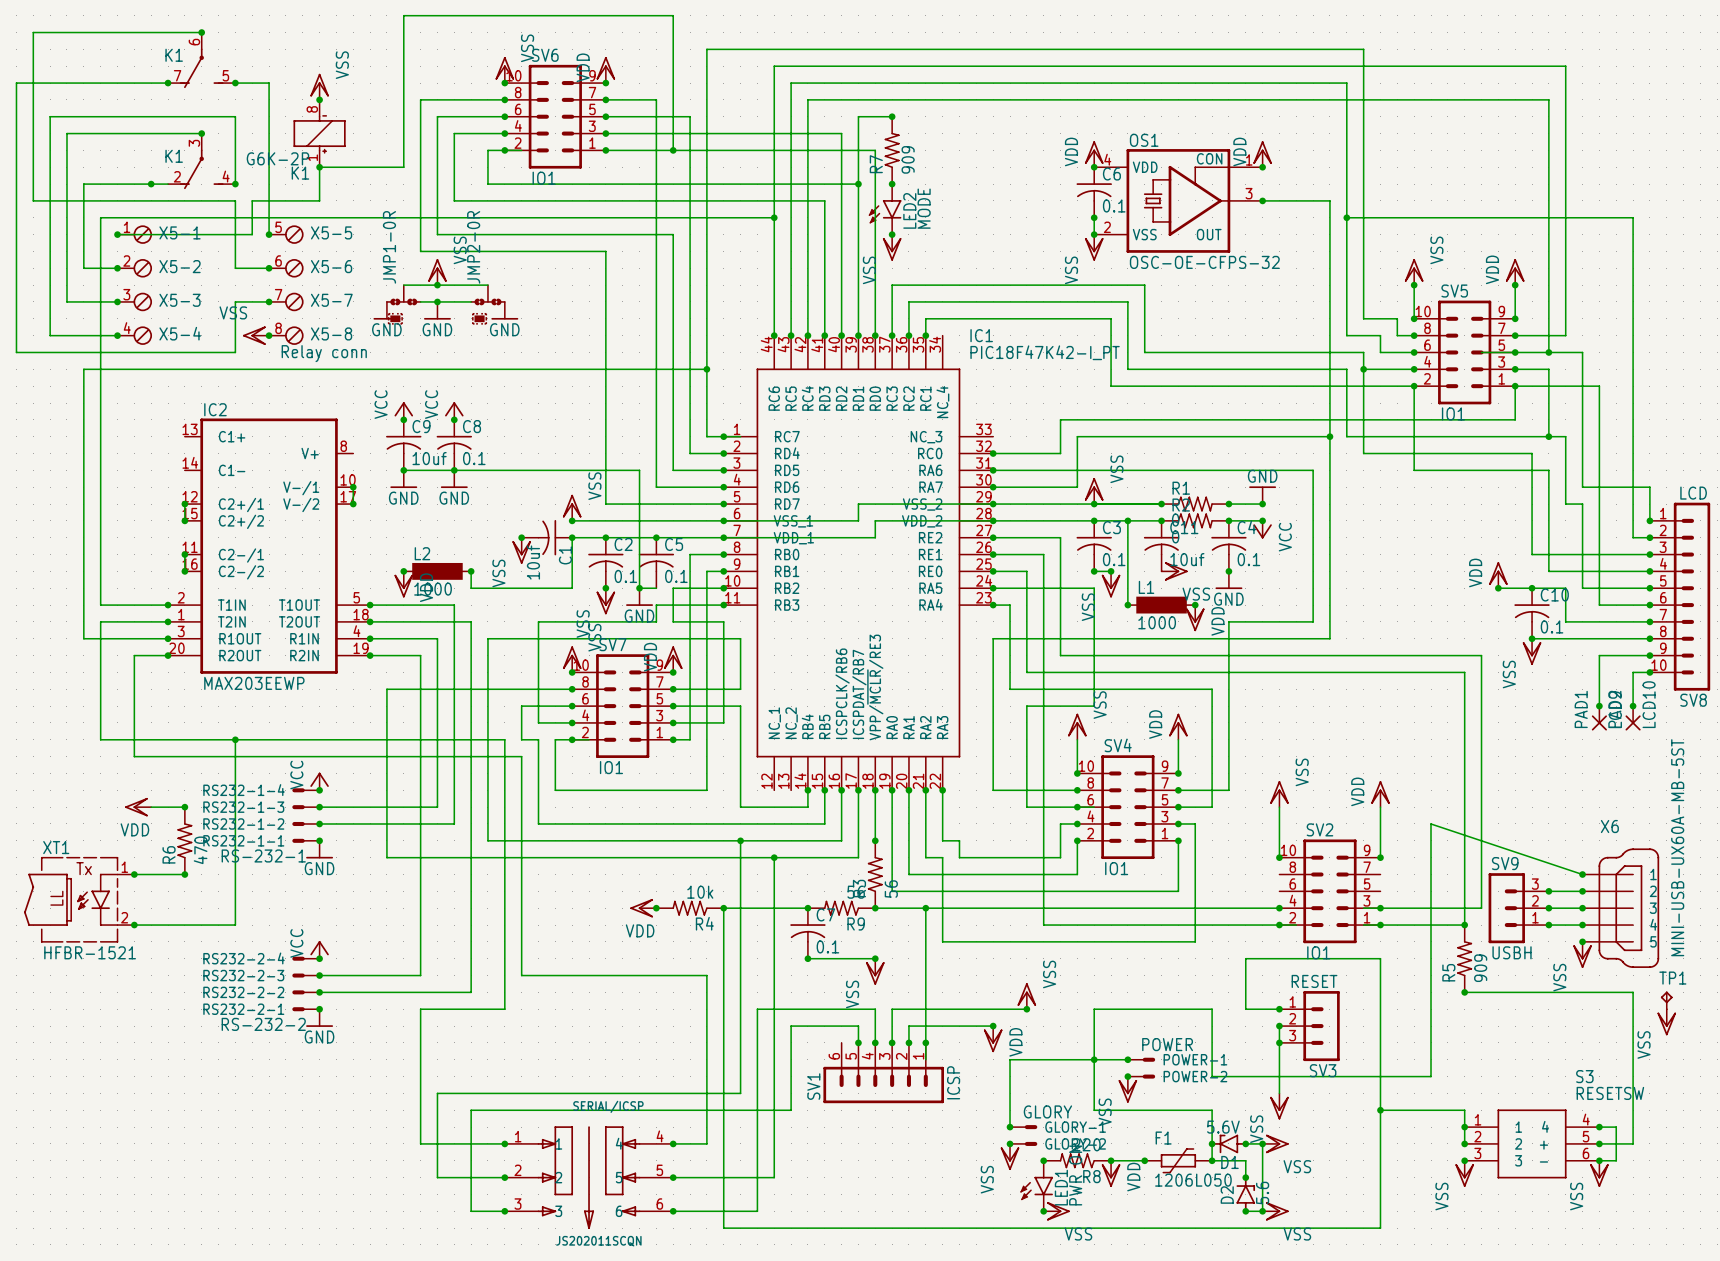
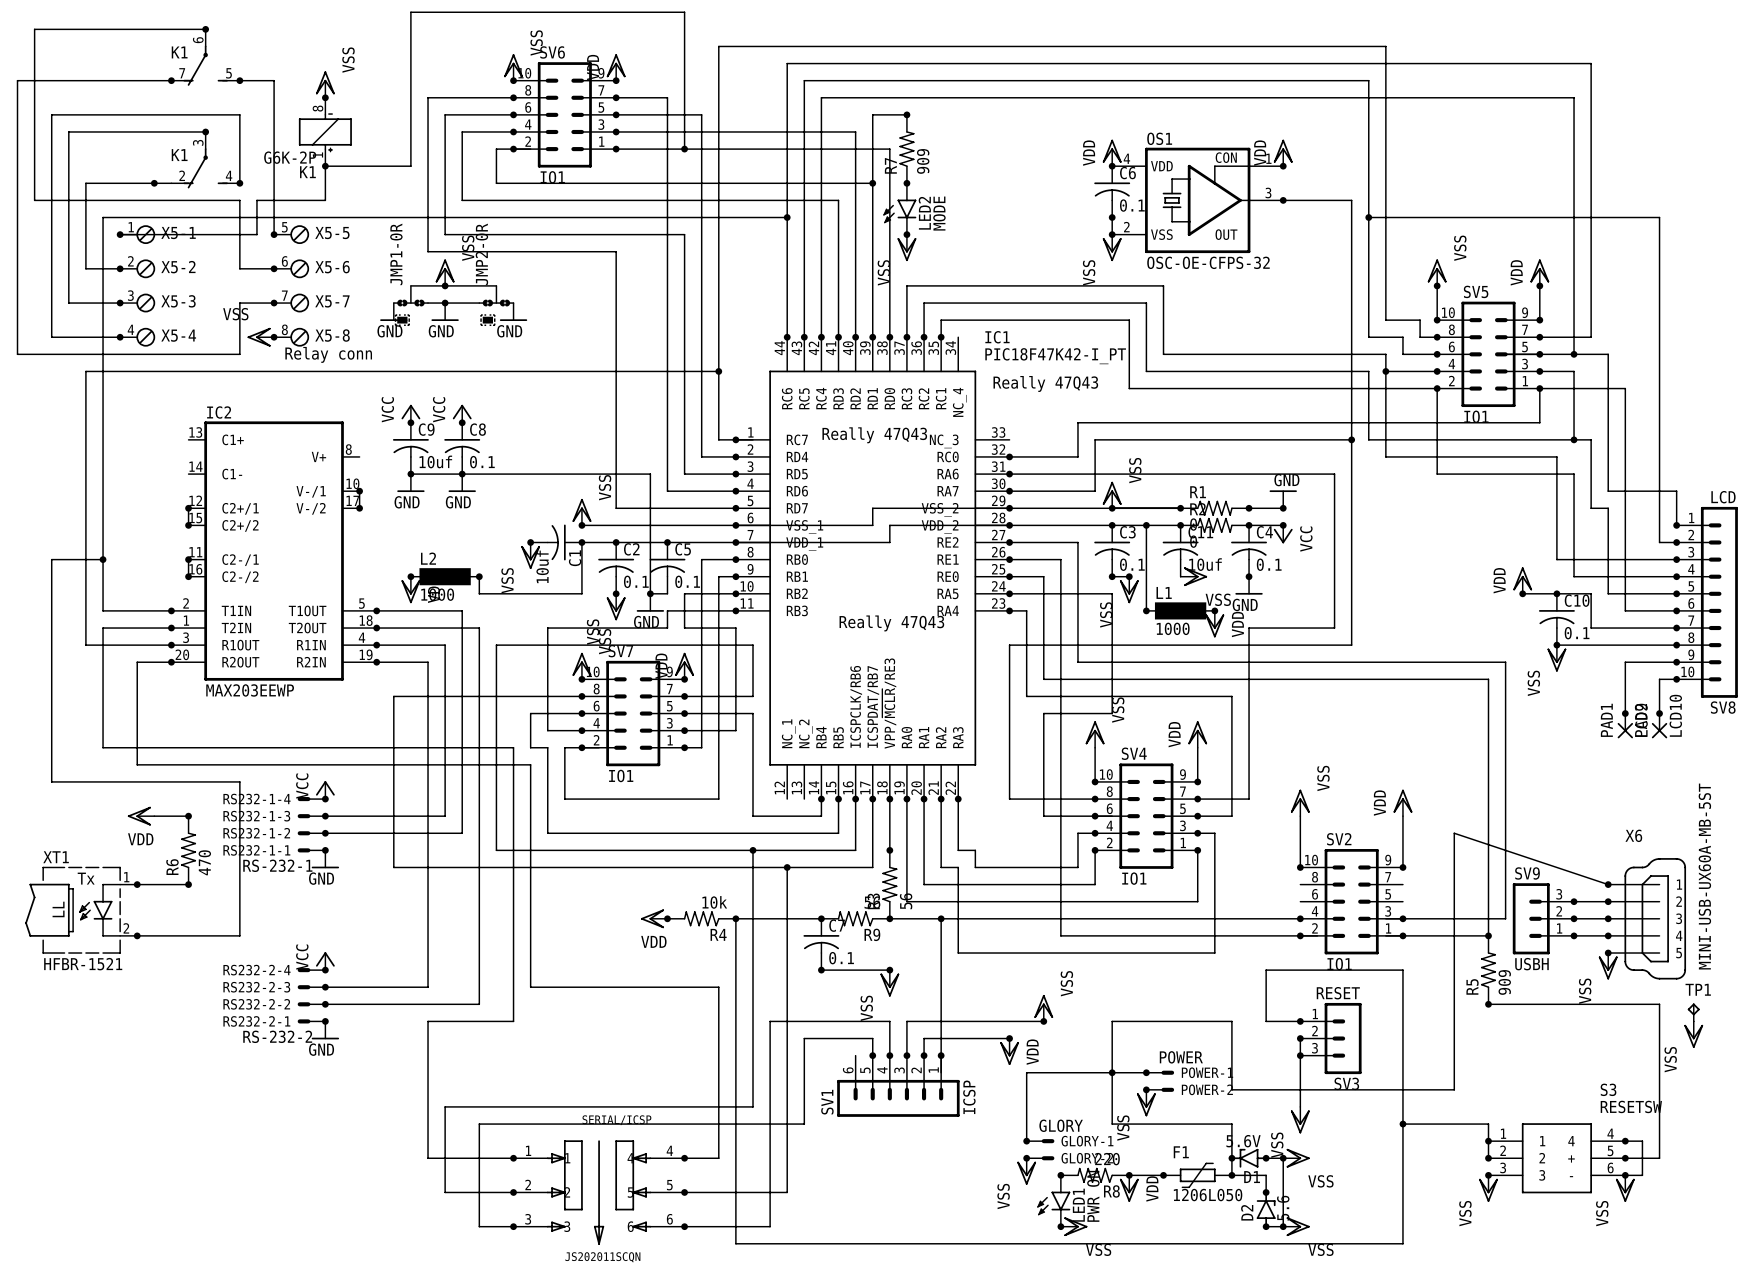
text: none -> Really 47Q43 (1045, 383)
text: none -> Really 47Q43 (874, 435)
junction: none -> (103, 559)
text: none -> Really 47Q43 (891, 623)
wire: (235, 739) (235, 773) -> (103, 559) (51, 559) (51, 781) (239, 781)
junction: (235, 739) -> none

